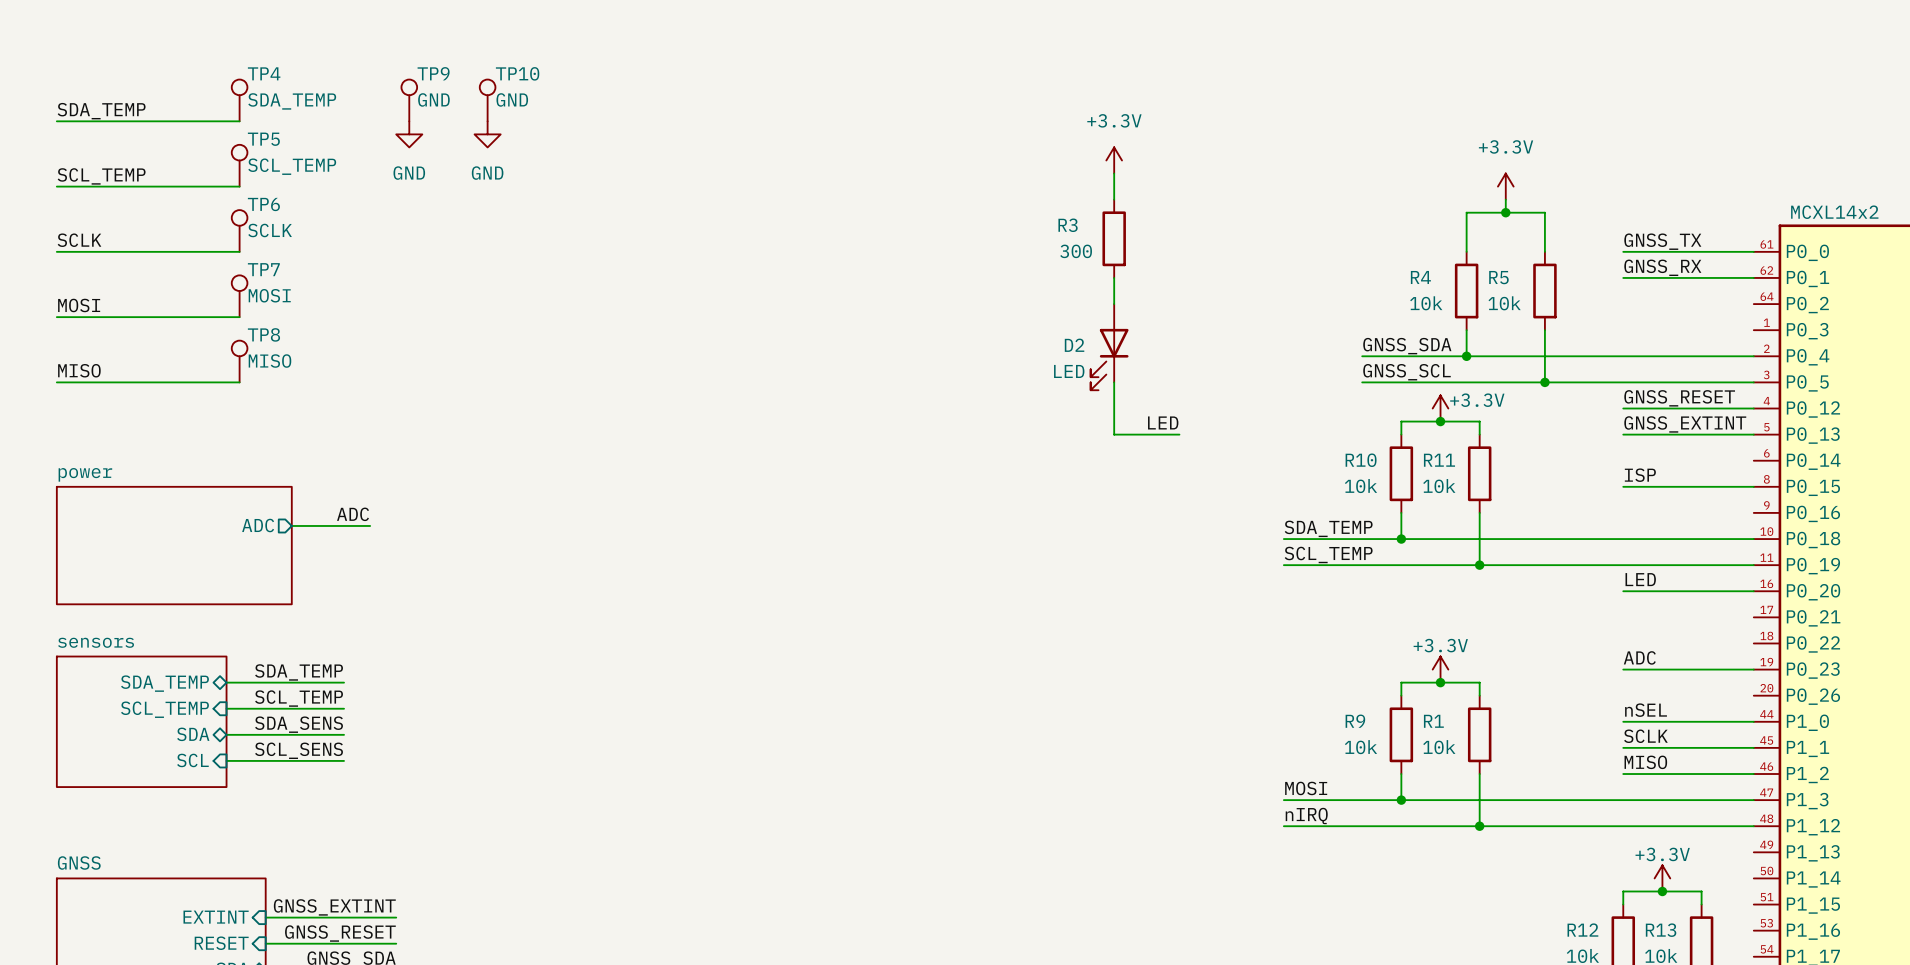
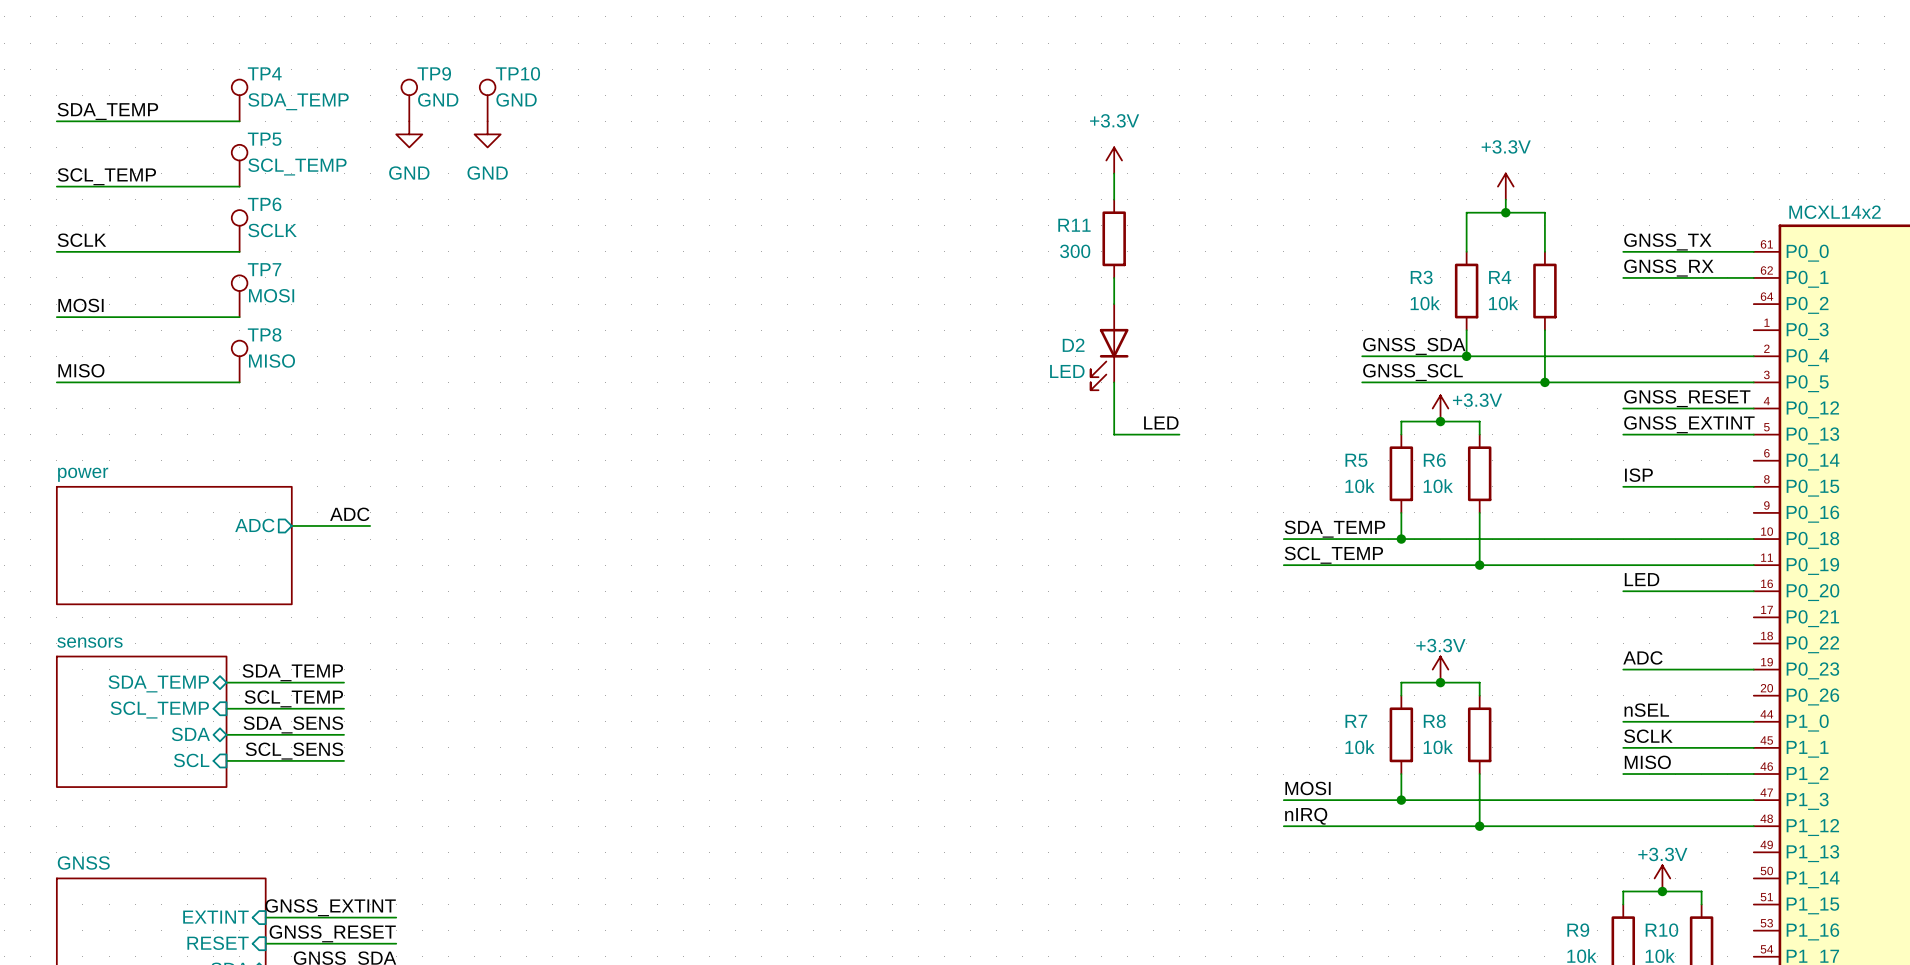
R3 name: R3 (1068, 225) -> R11 (1074, 225)
R4 name: R4 (1420, 277) -> R3 (1421, 277)
R5 name: R5 (1498, 277) -> R4 (1500, 277)
R10 name: R10 (1361, 460) -> R5 (1356, 460)
R11 name: R11 (1439, 460) -> R6 (1434, 460)
R9 name: R9 (1355, 721) -> R7 (1356, 721)
R1 name: R1 (1433, 721) -> R8 (1434, 721)
R12 name: R12 (1582, 930) -> R9 (1578, 930)
R13 name: R13 (1661, 930) -> R10 (1661, 930)

